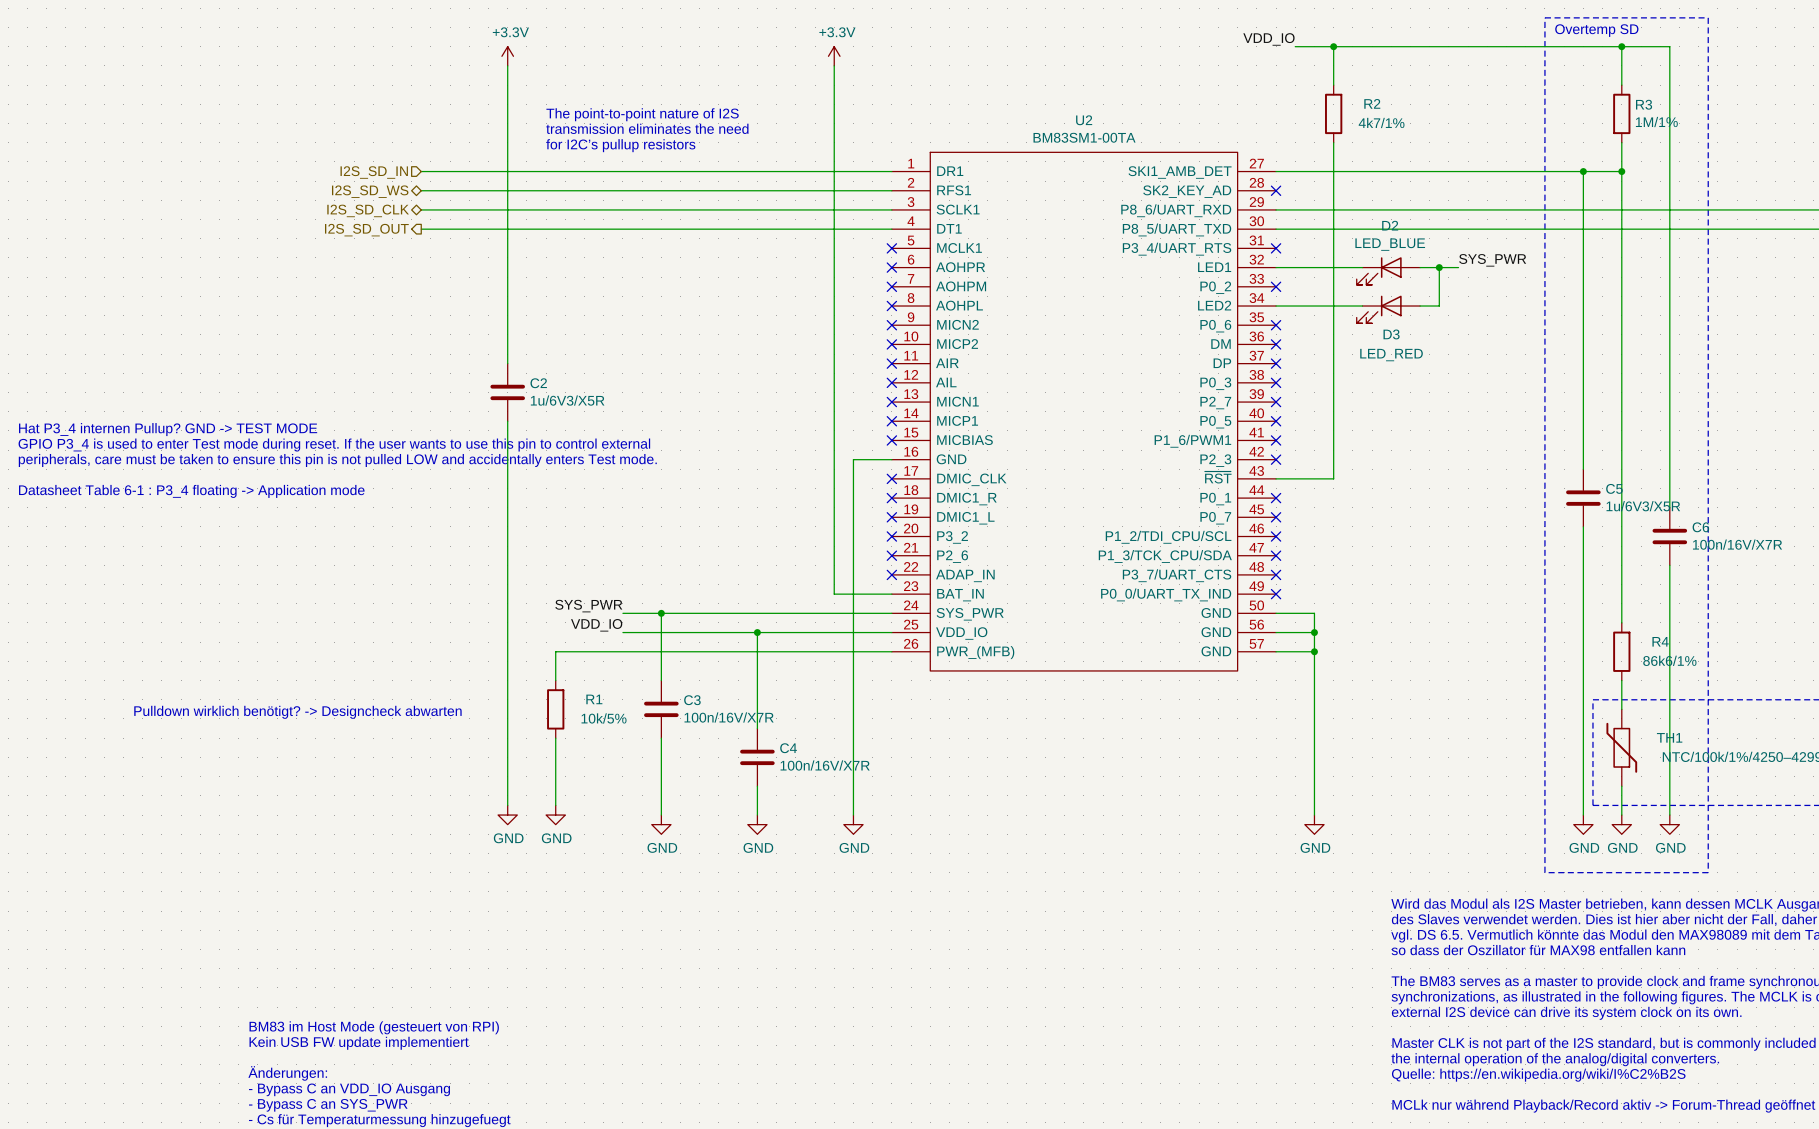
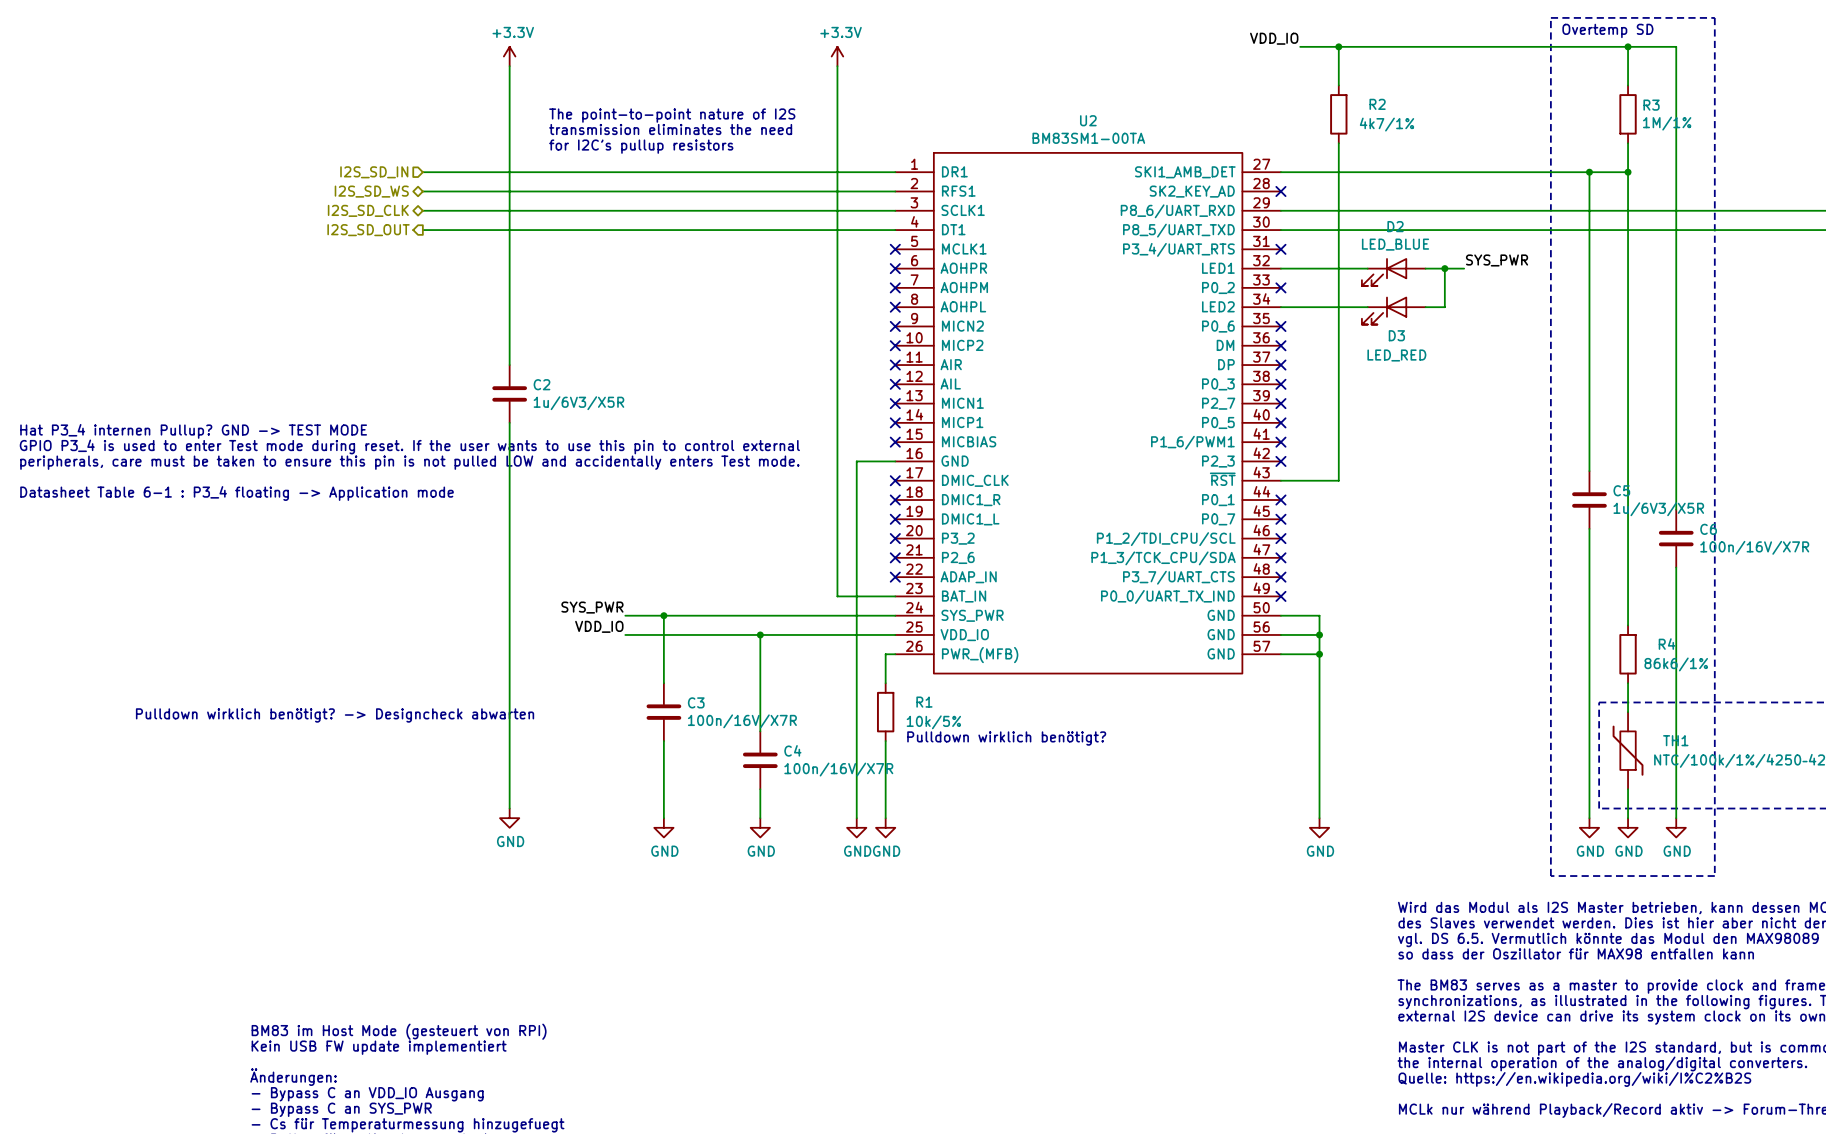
wire: (882, 651) (555, 651) (555, 680) -> (885, 654) (885, 683)
R1 position: (555, 709) -> (885, 712)
text: none -> Pulldown wirklich benötigt? (1006, 738)
wire: (555, 738) (555, 805) -> none
wire: none -> (885, 741) (885, 818)
power symbol: GND (555, 815) -> none
power symbol: none -> GND (885, 827)

